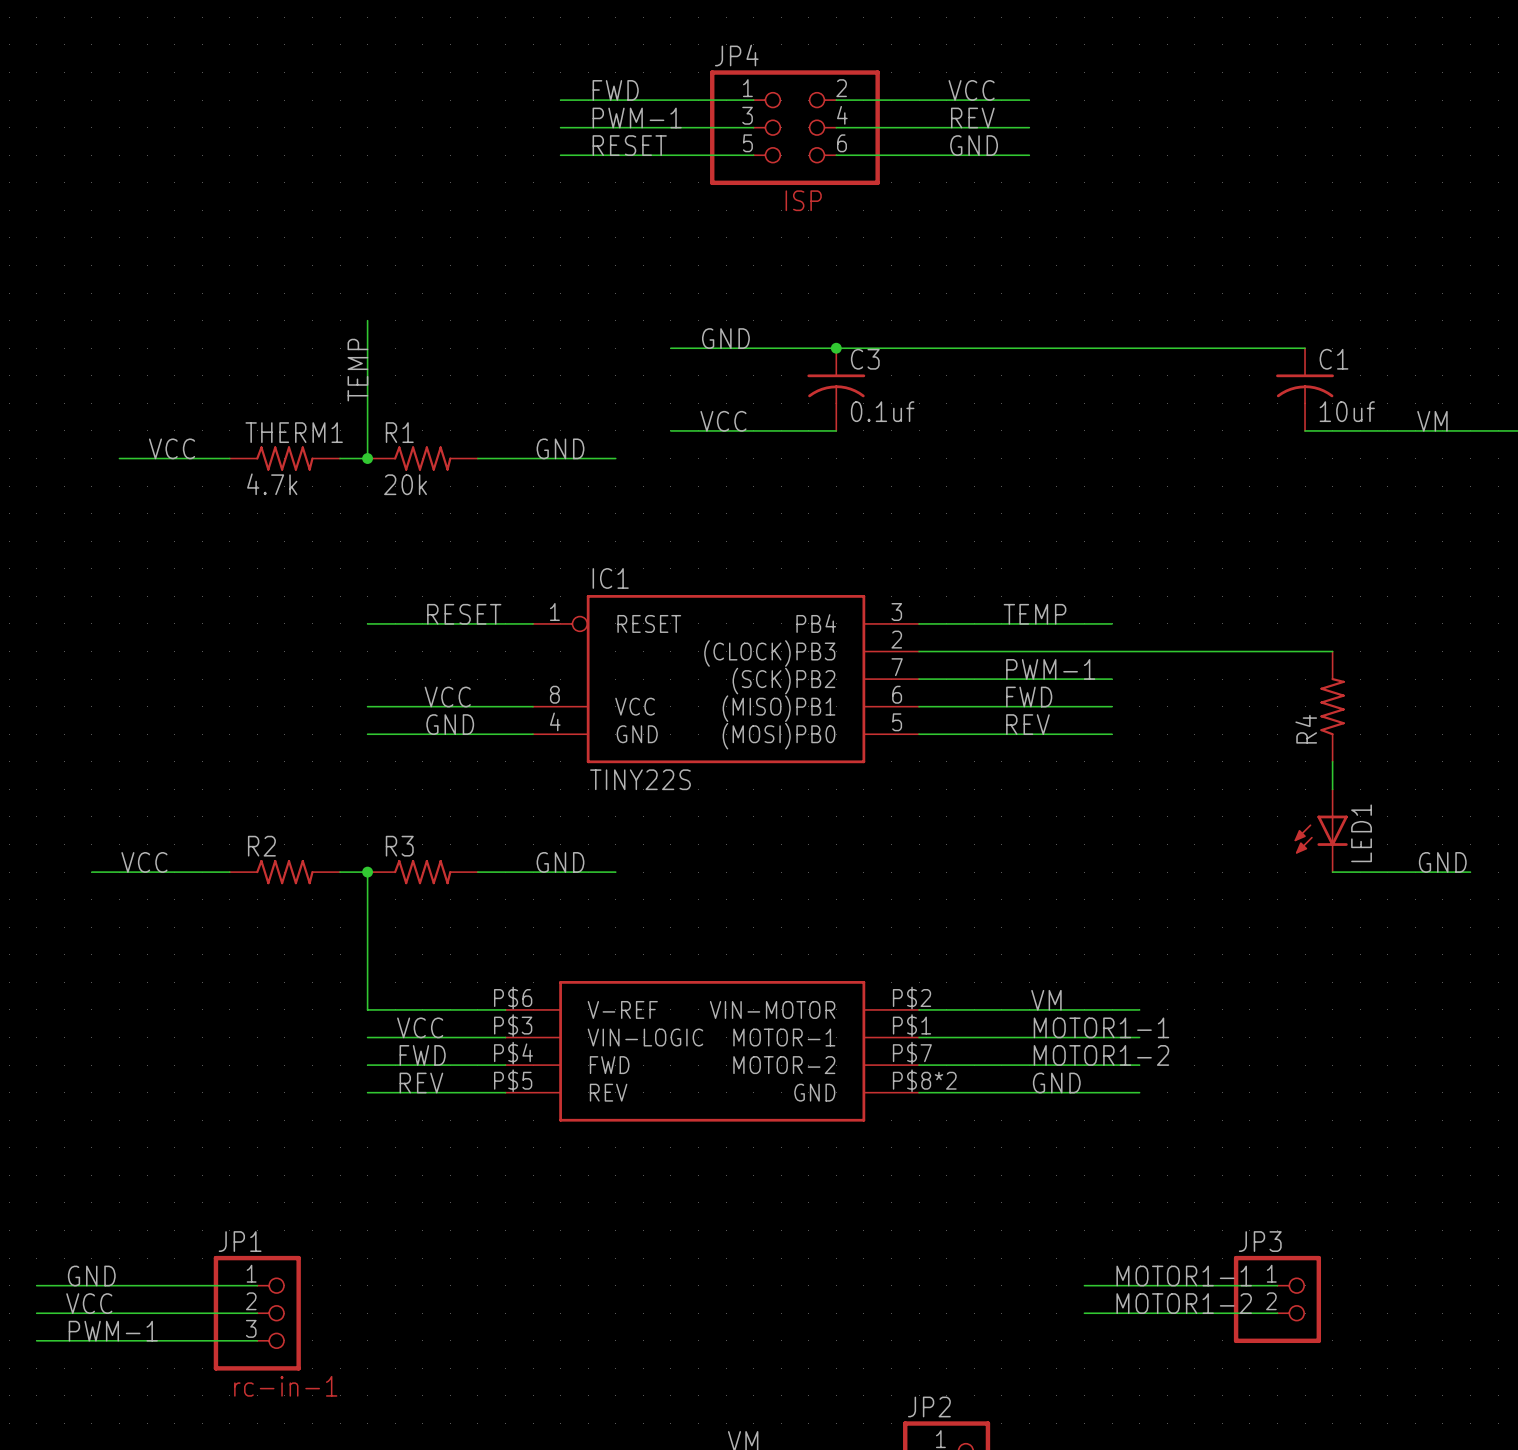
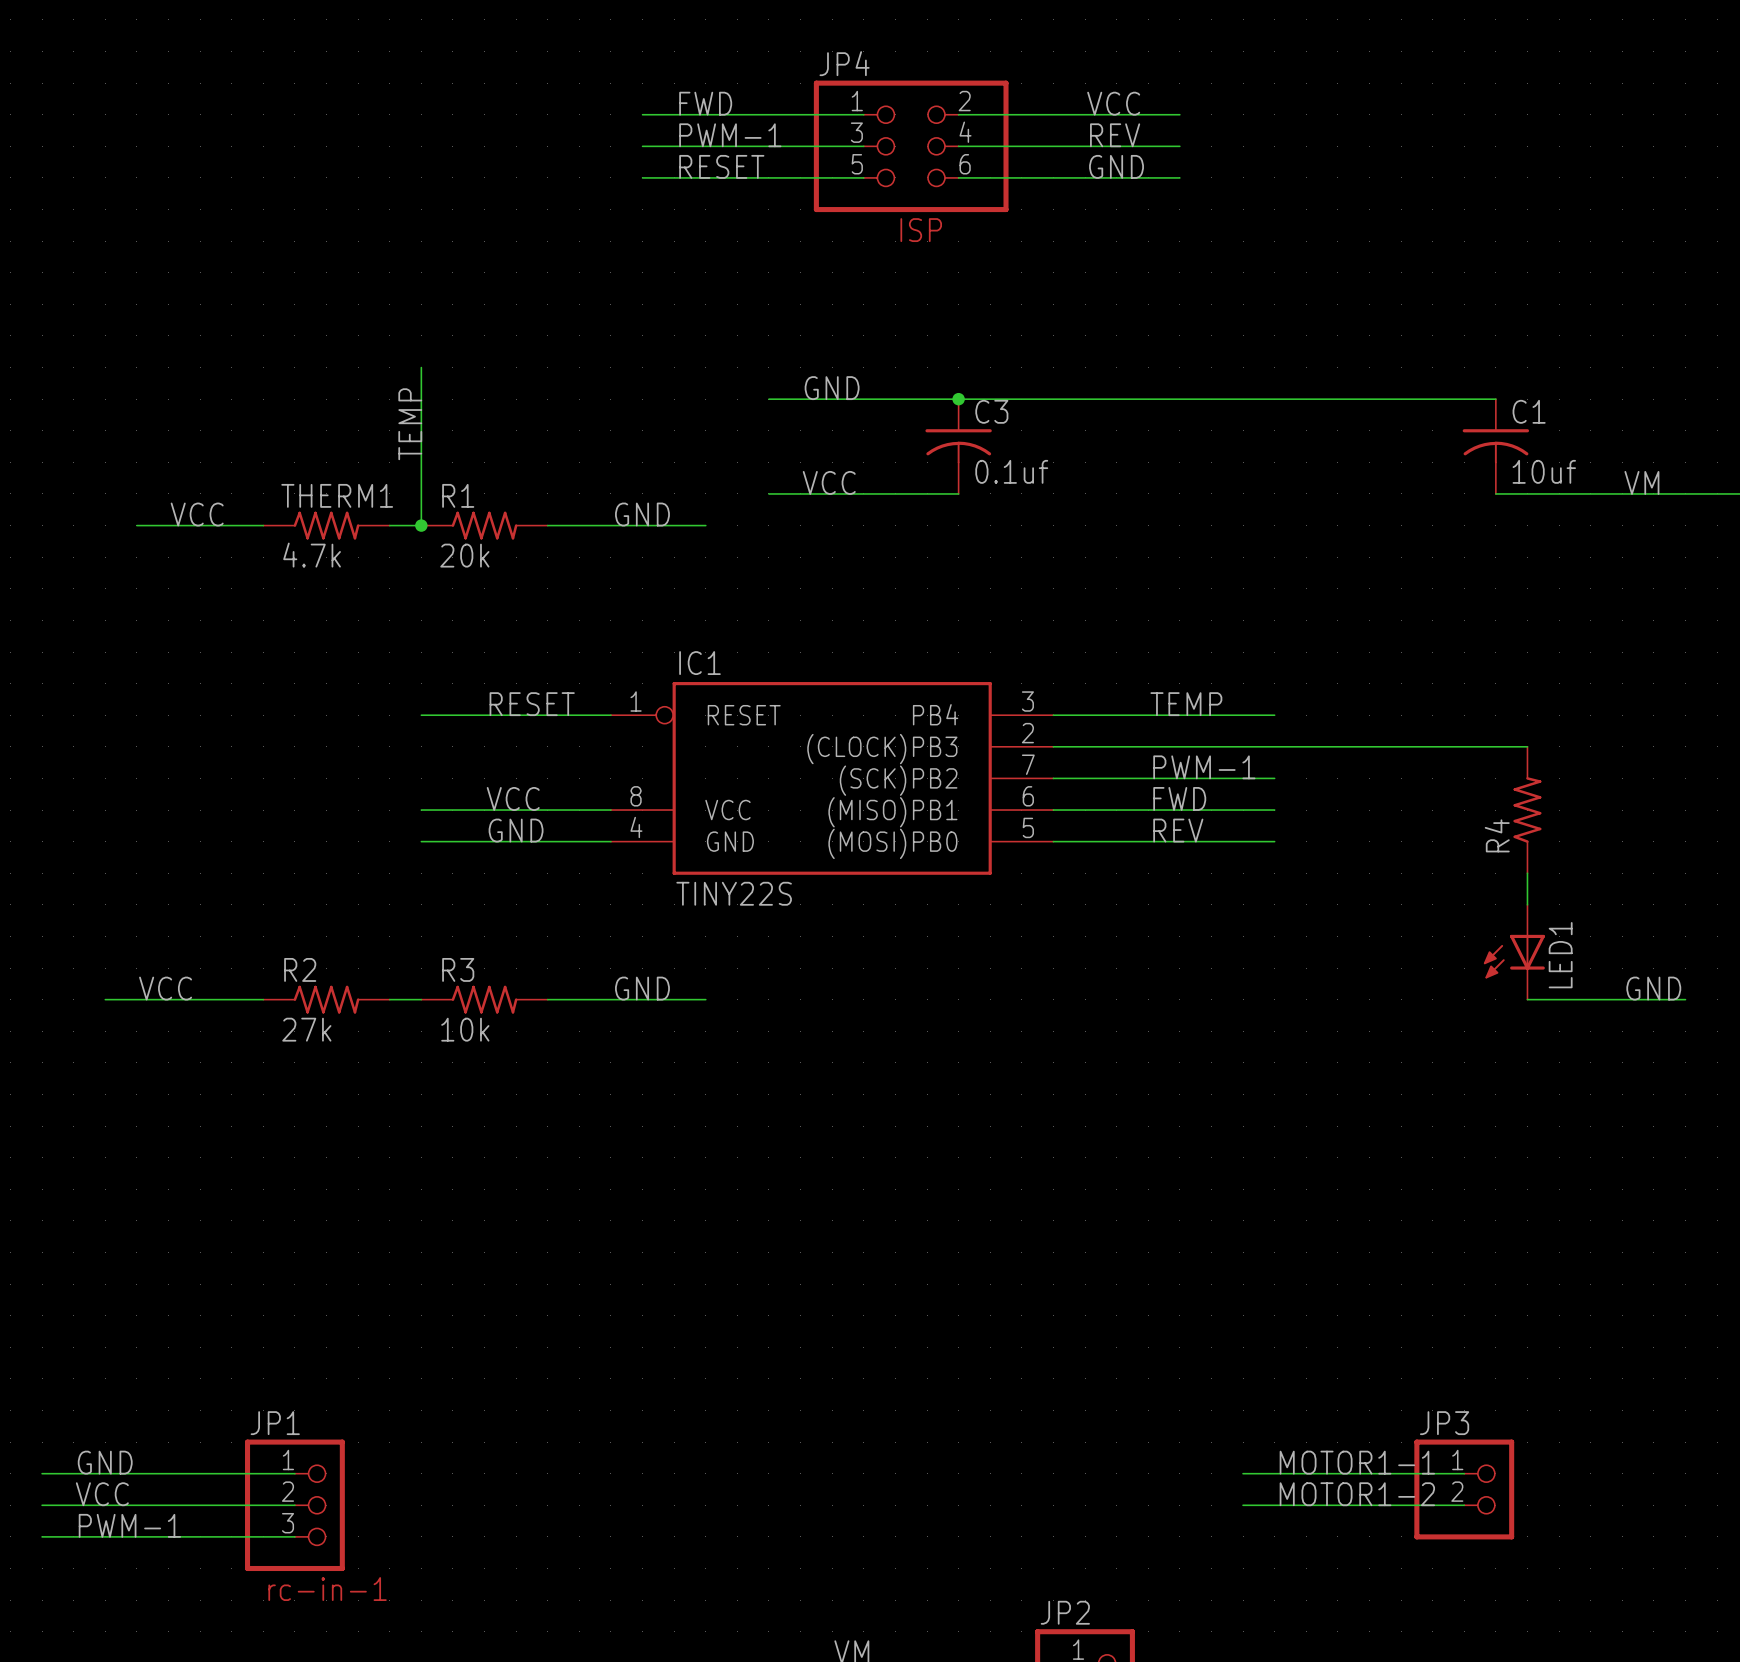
wire: (367, 872) (367, 1009) (505, 1009) -> none
junction: (367, 872) -> none
R2 value: none -> 27k (306, 1029)
R3 value: none -> 10k (465, 1029)
label: VM (1046, 1000) -> none
wire: (919, 1009) (1139, 1009) -> none
label: VCC (420, 1027) -> none
label: MOTOR1-1 (1101, 1027) -> none
wire: (367, 1037) (505, 1037) -> none
wire: (919, 1037) (1139, 1037) -> none
part: (712, 1051) -> none
label: FWD (422, 1055) -> none
label: MOTOR1-2 (1101, 1055) -> none
wire: (367, 1065) (505, 1065) -> none
wire: (919, 1065) (1139, 1065) -> none
label: REV (421, 1083) -> none
label: GND (1056, 1083) -> none
wire: (367, 1092) (505, 1092) -> none
wire: (919, 1092) (1139, 1092) -> none

